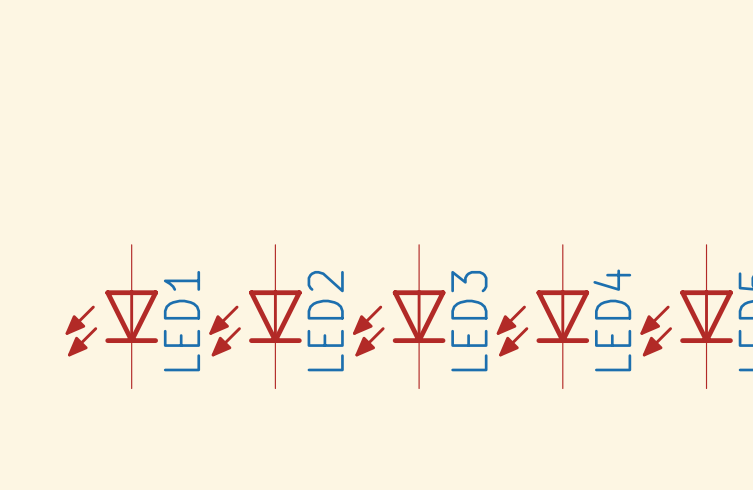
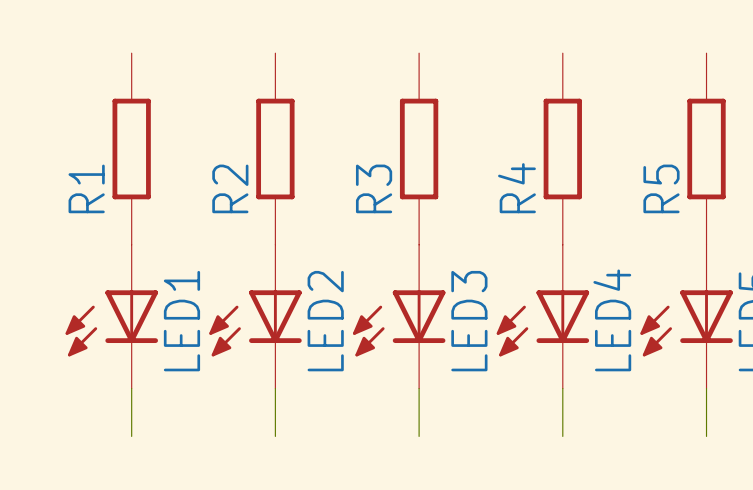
R1: none -> (131, 149)
R2: none -> (275, 149)
R3: none -> (419, 149)
R4: none -> (562, 149)
R5: none -> (706, 149)
wire: none -> (131, 388) (131, 436)
wire: none -> (275, 388) (275, 436)
wire: none -> (419, 388) (419, 436)
wire: none -> (562, 388) (562, 436)
wire: none -> (706, 388) (706, 436)

